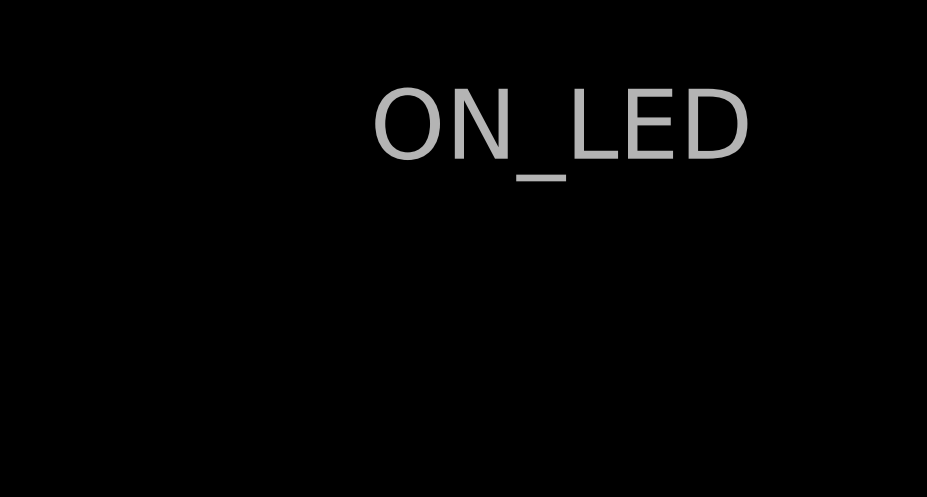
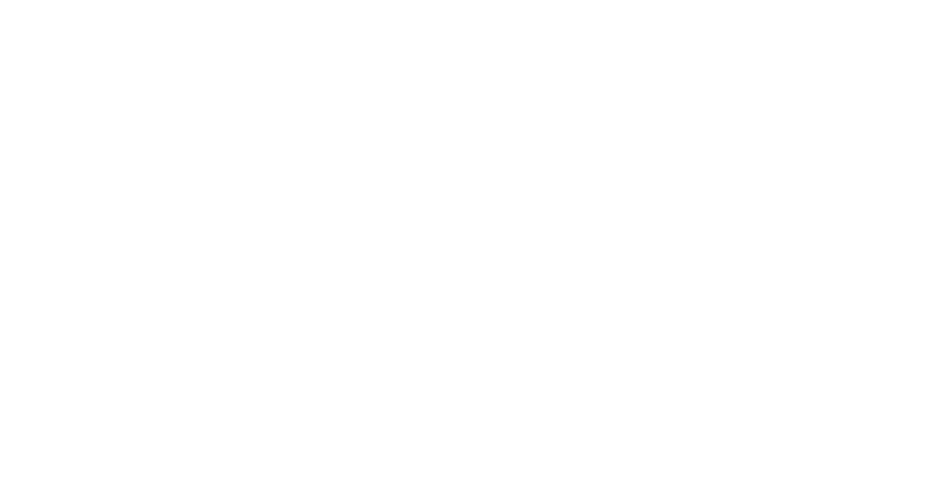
label: ON_LED (561, 134) -> none

